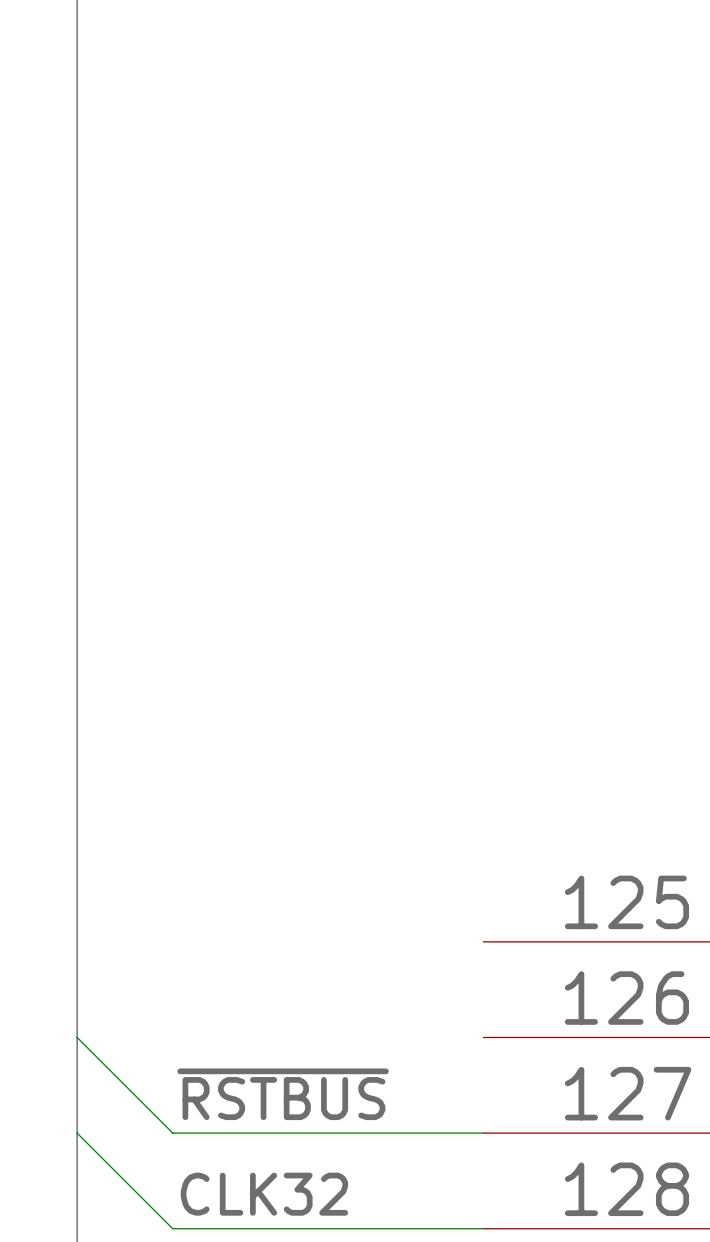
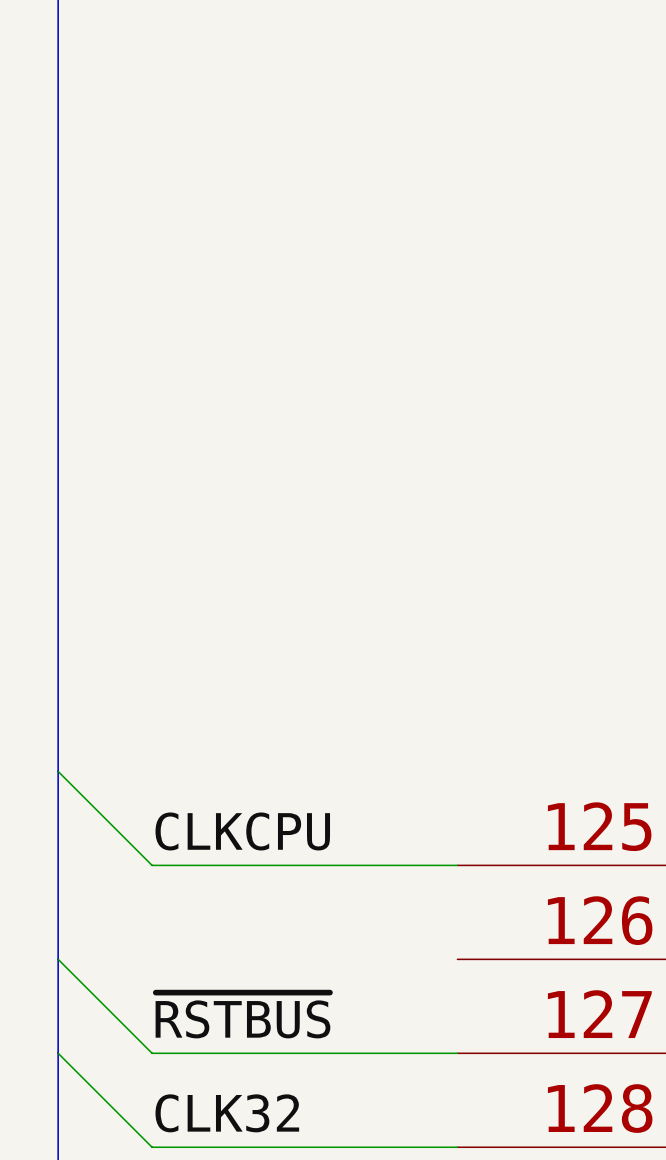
wire: none -> (58, 771) (152, 865) (457, 865)
label: none -> CLKCPU (242, 831)

